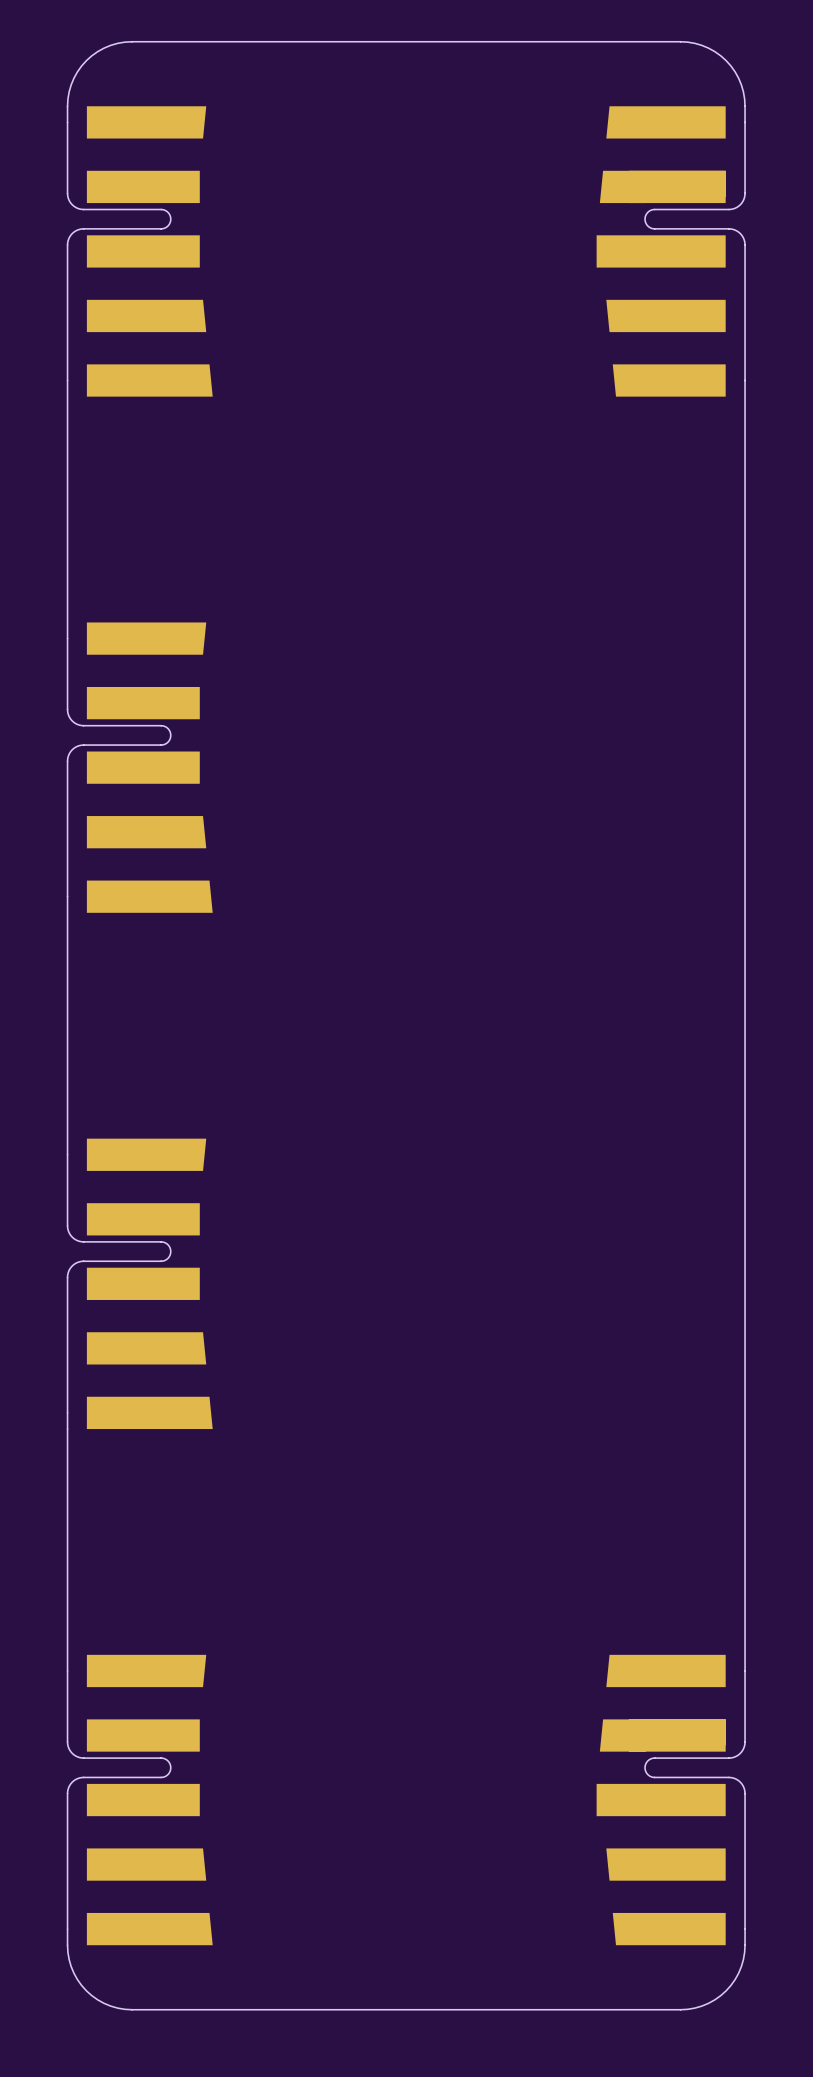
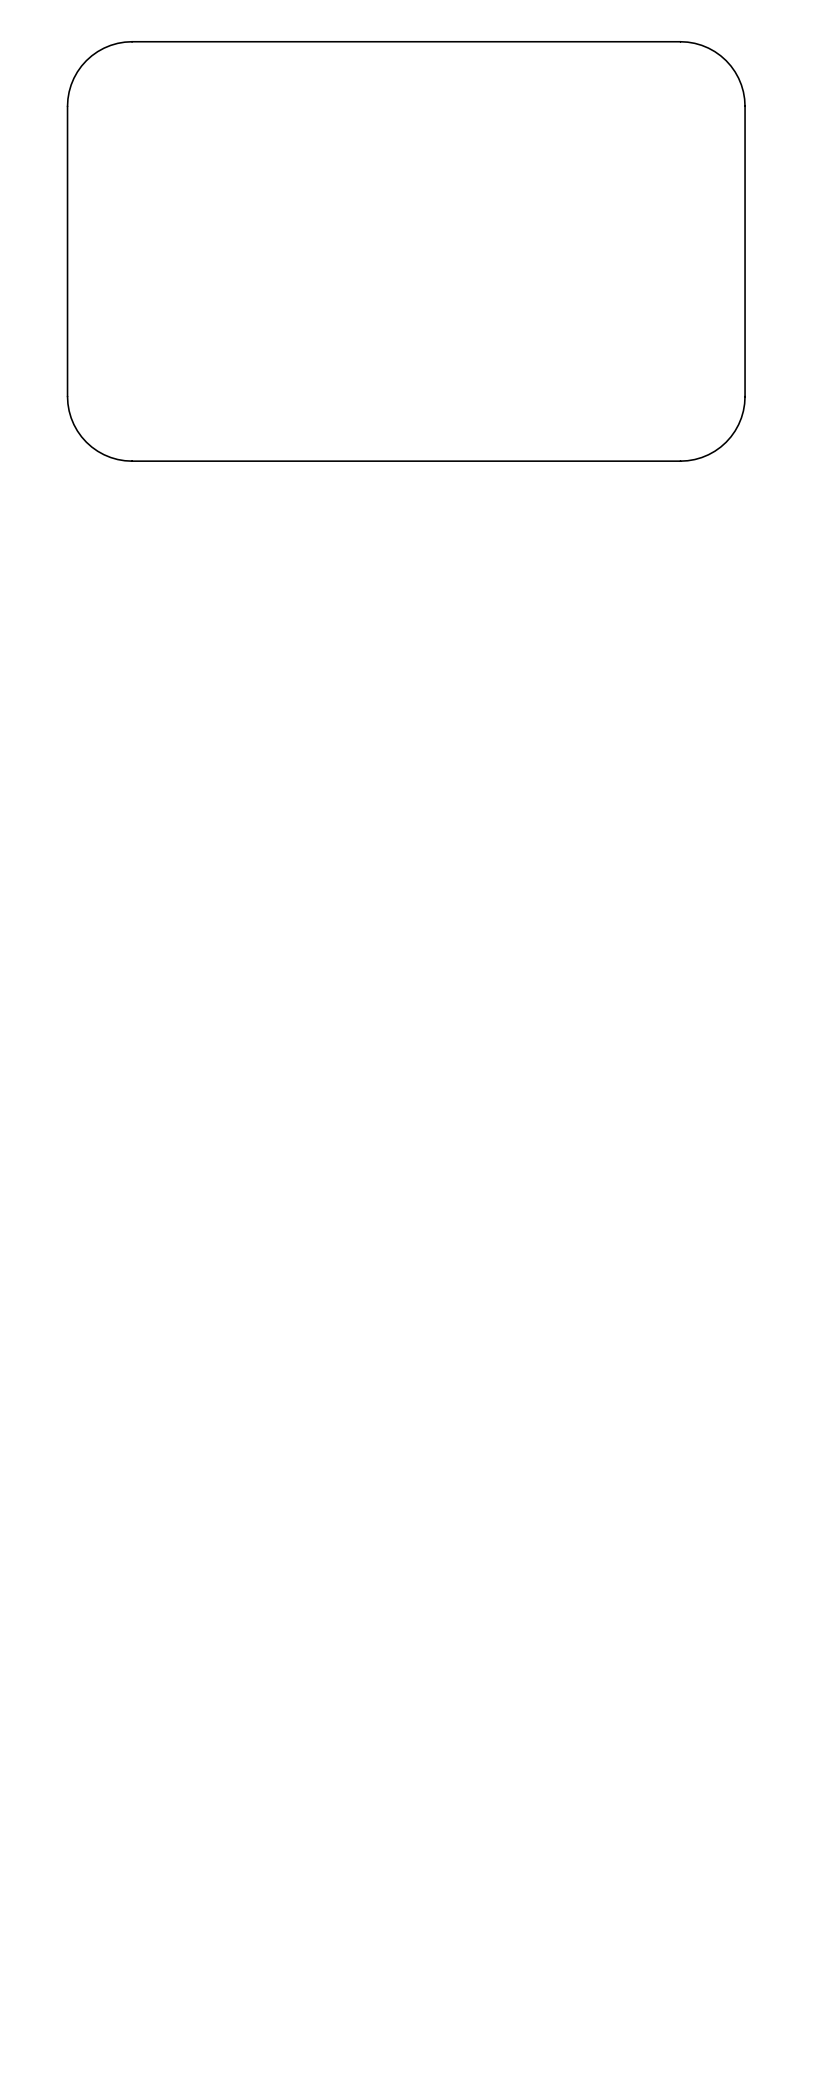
board edge: none -> (745, 122) (745, 380)
part: (139, 251) -> none
part: (671, 251) -> none
board edge: (67, 396) (67, 638) -> (67, 396) (71, 417) (77, 430) (86, 442) (97, 451) (110, 457) (132, 461) (687, 460) (708, 454) (726, 442) (738, 424) (743, 410) (745, 396)
board edge: (745, 396) (745, 1670) -> none
part: (139, 767) -> none
board edge: (67, 896) (67, 1154) -> (67, 122) (67, 380)
part: (139, 1283) -> none
board edge: (67, 1412) (67, 1670) -> none
part: (139, 1800) -> none
part: (671, 1800) -> none
board edge: (745, 1929) (743, 1959) (738, 1973) (730, 1985) (720, 1995) (708, 2003) (694, 2008) (680, 2009) (124, 2009) (104, 2003) (91, 1995) (81, 1985) (73, 1973) (69, 1959) (67, 1929) -> none

